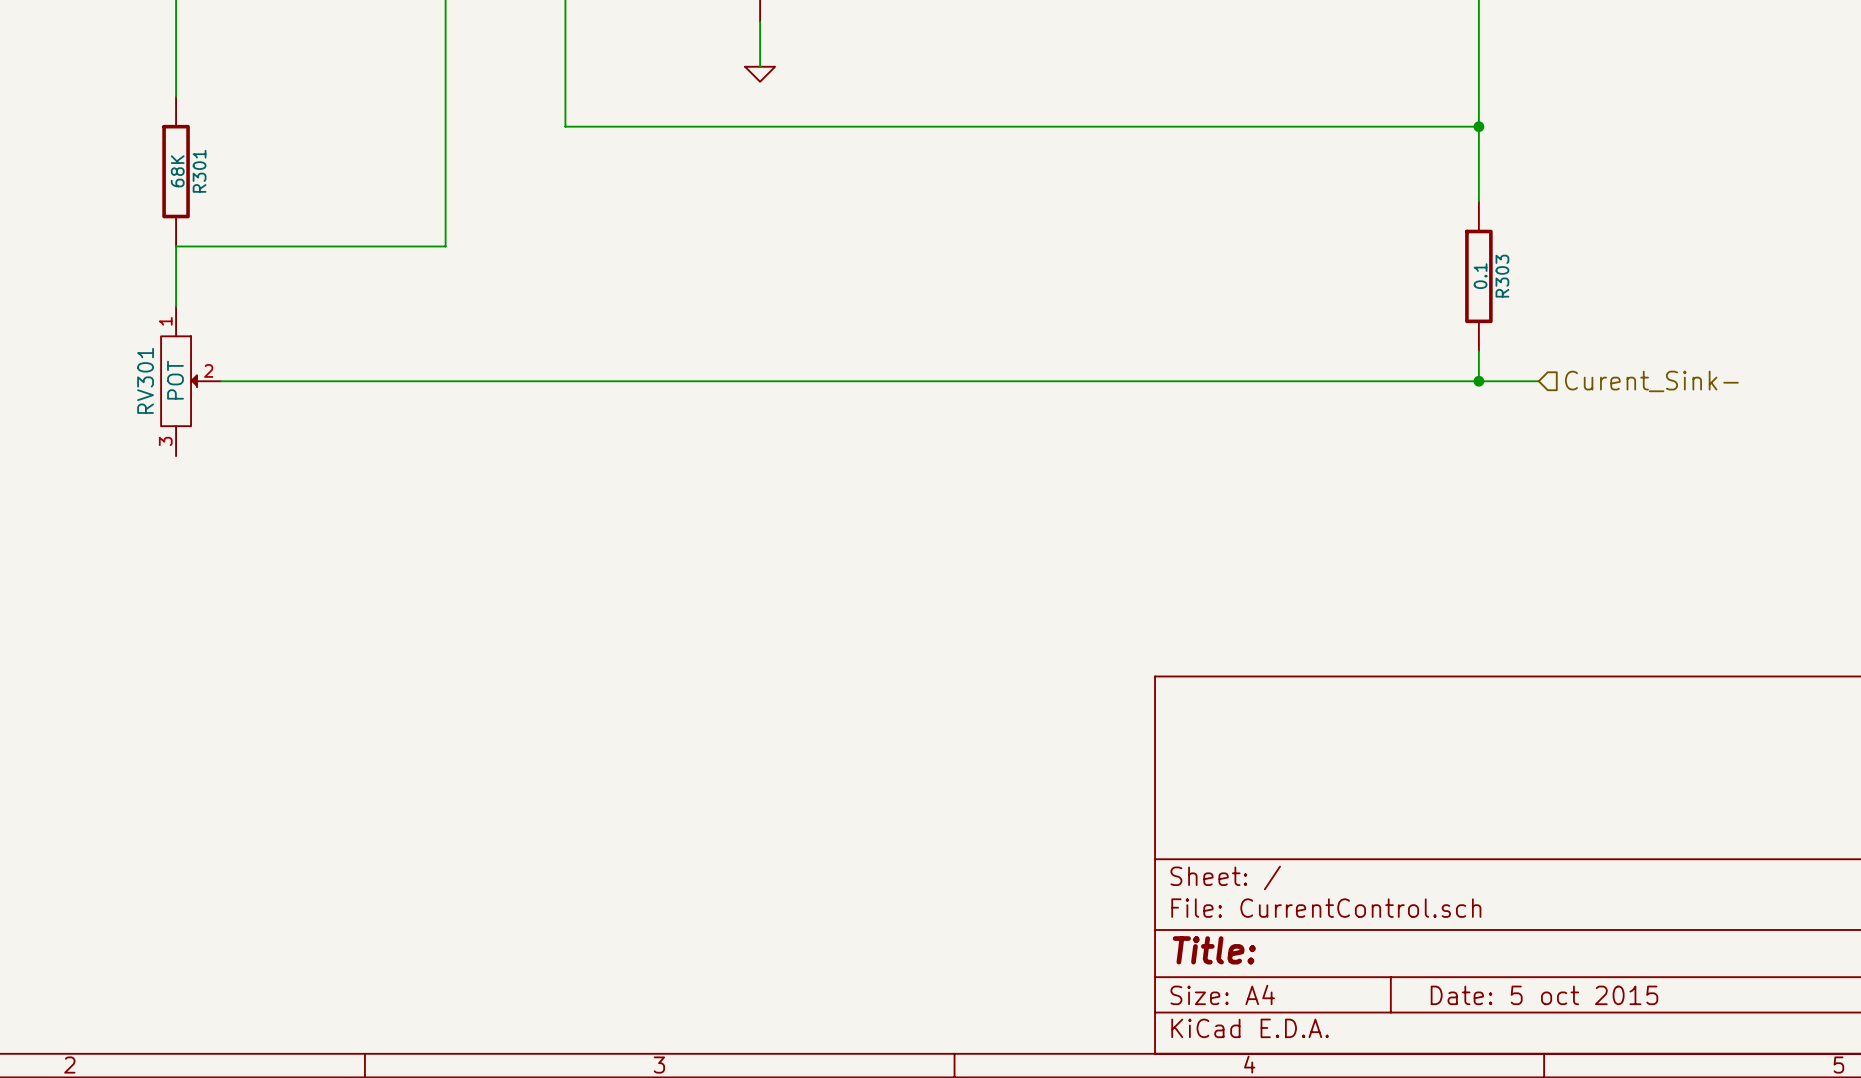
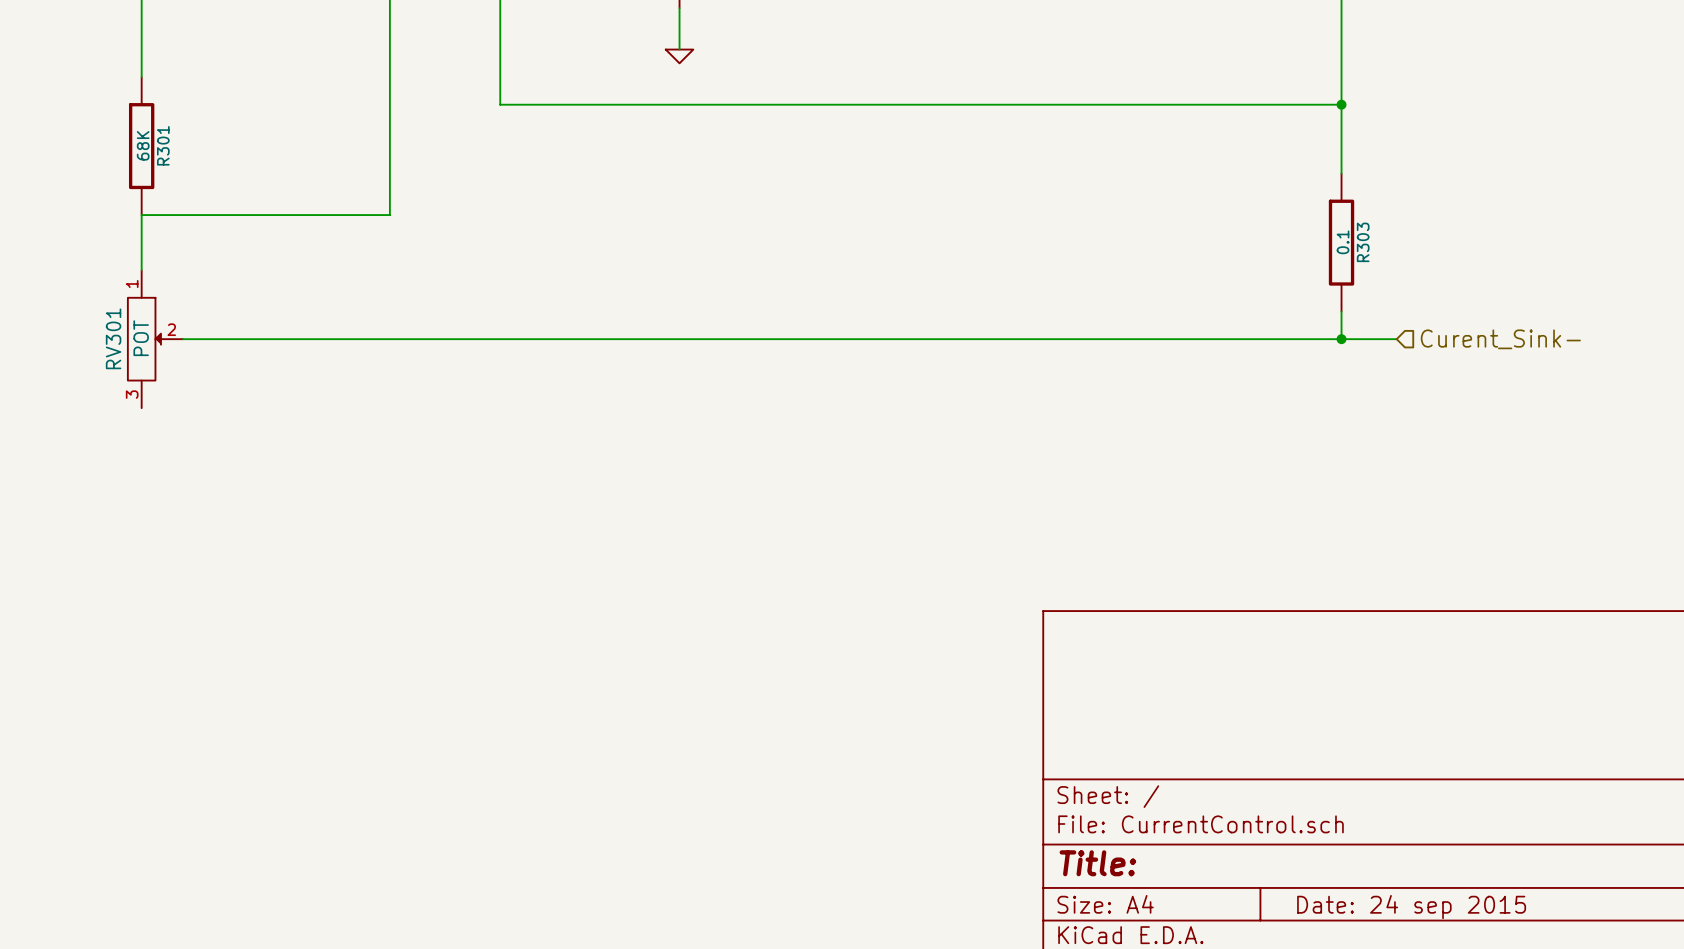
title block: Date: 5 oct 2015 (1544, 995) -> Date: 24 sep 2015 (1411, 907)

